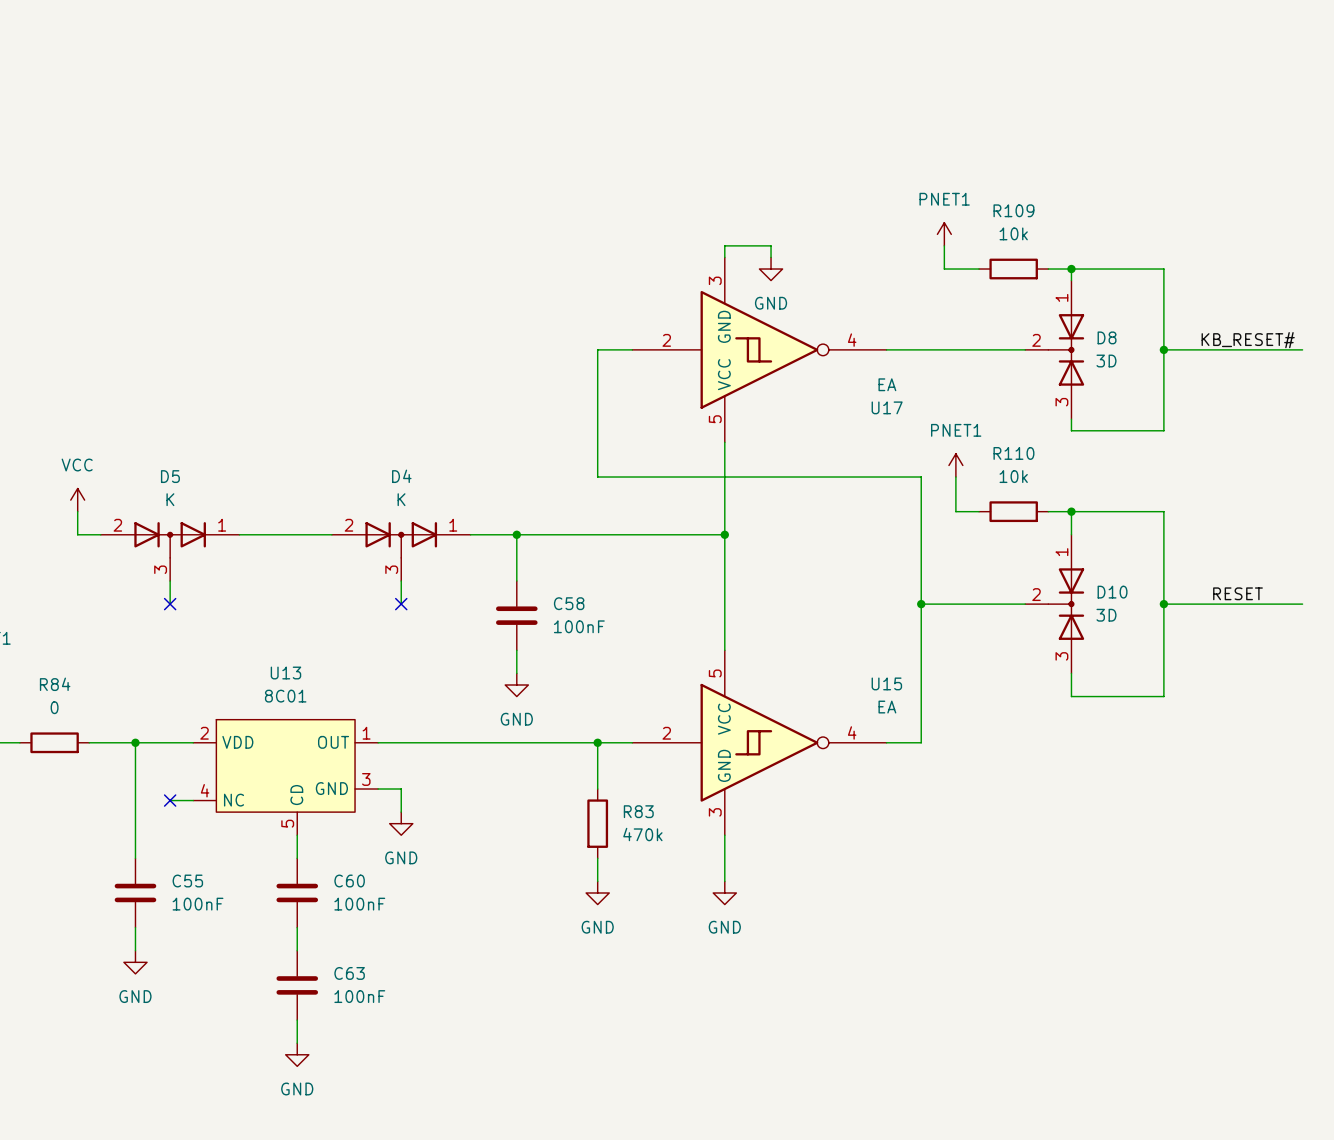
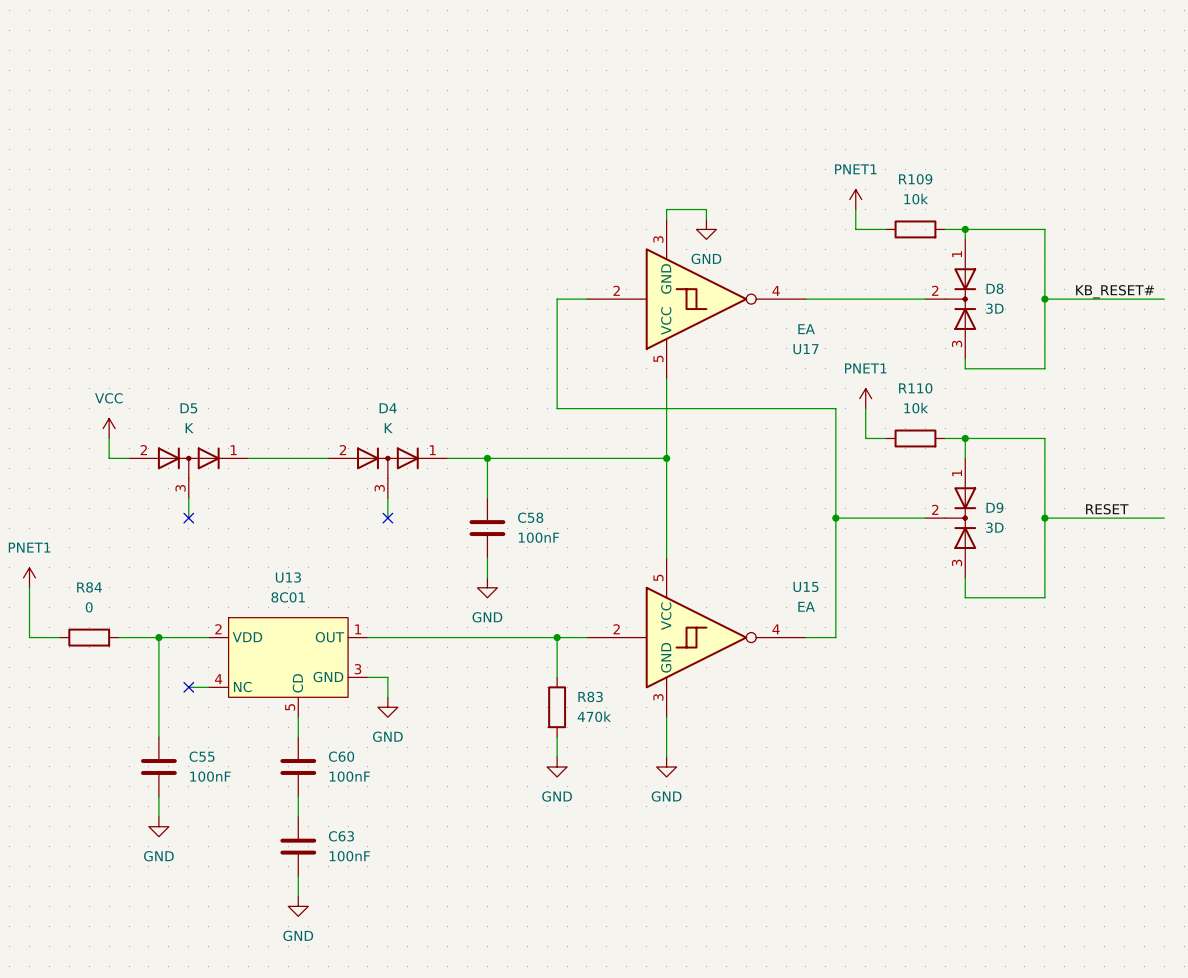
D10 name: D10 (1112, 592) -> D9 (994, 507)

